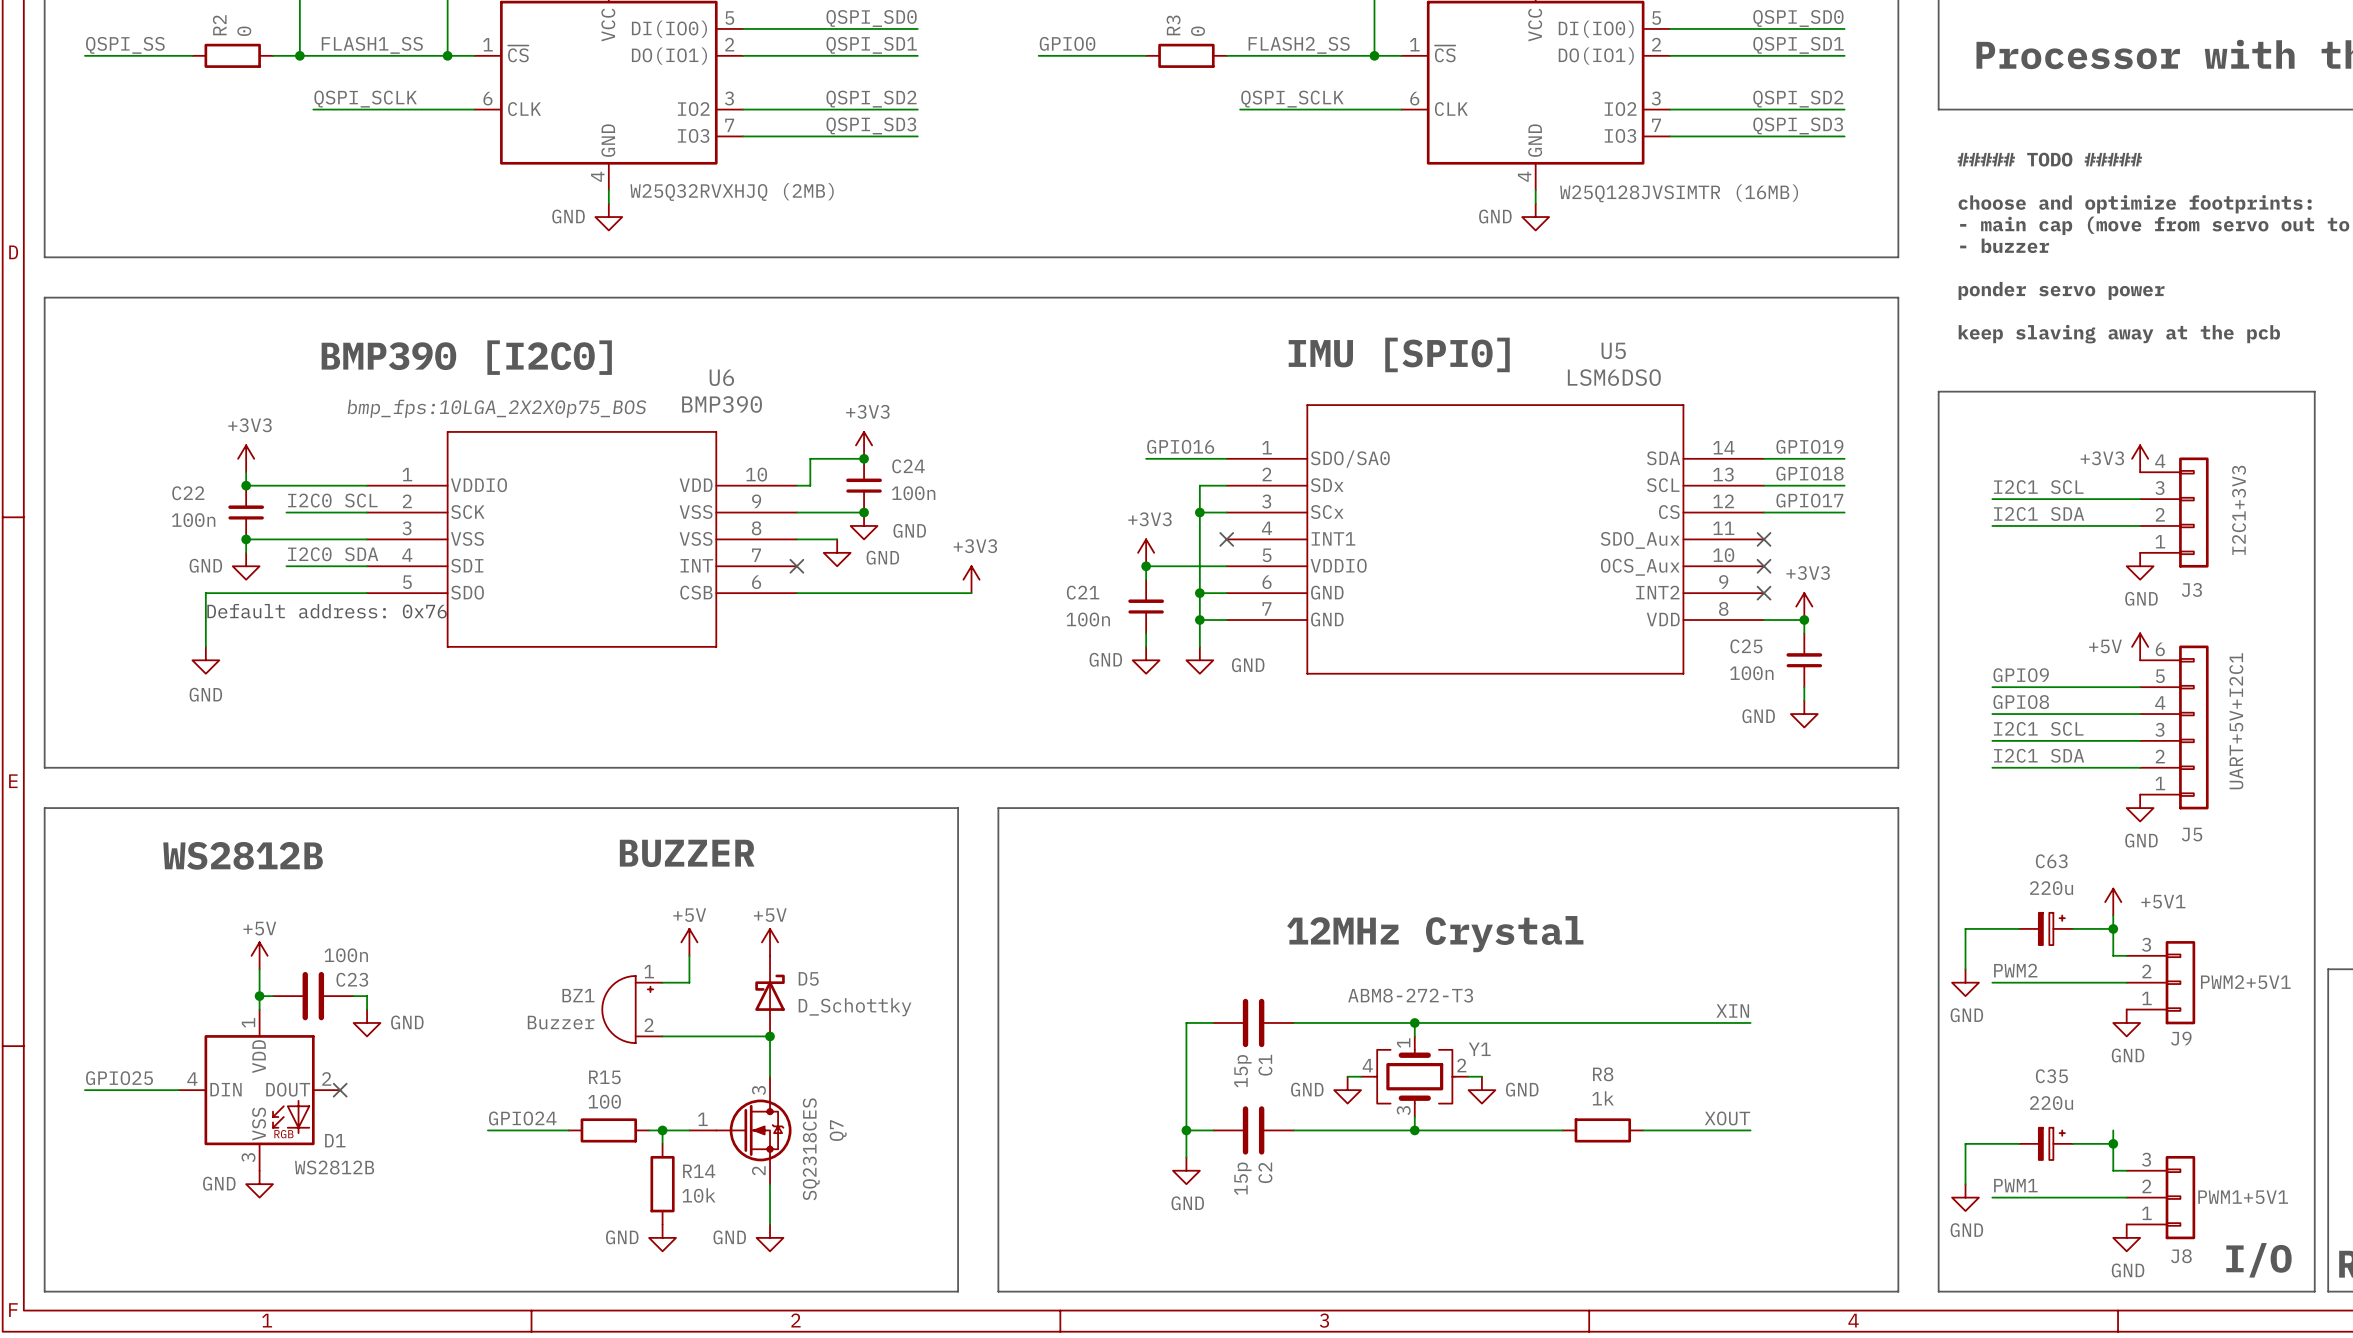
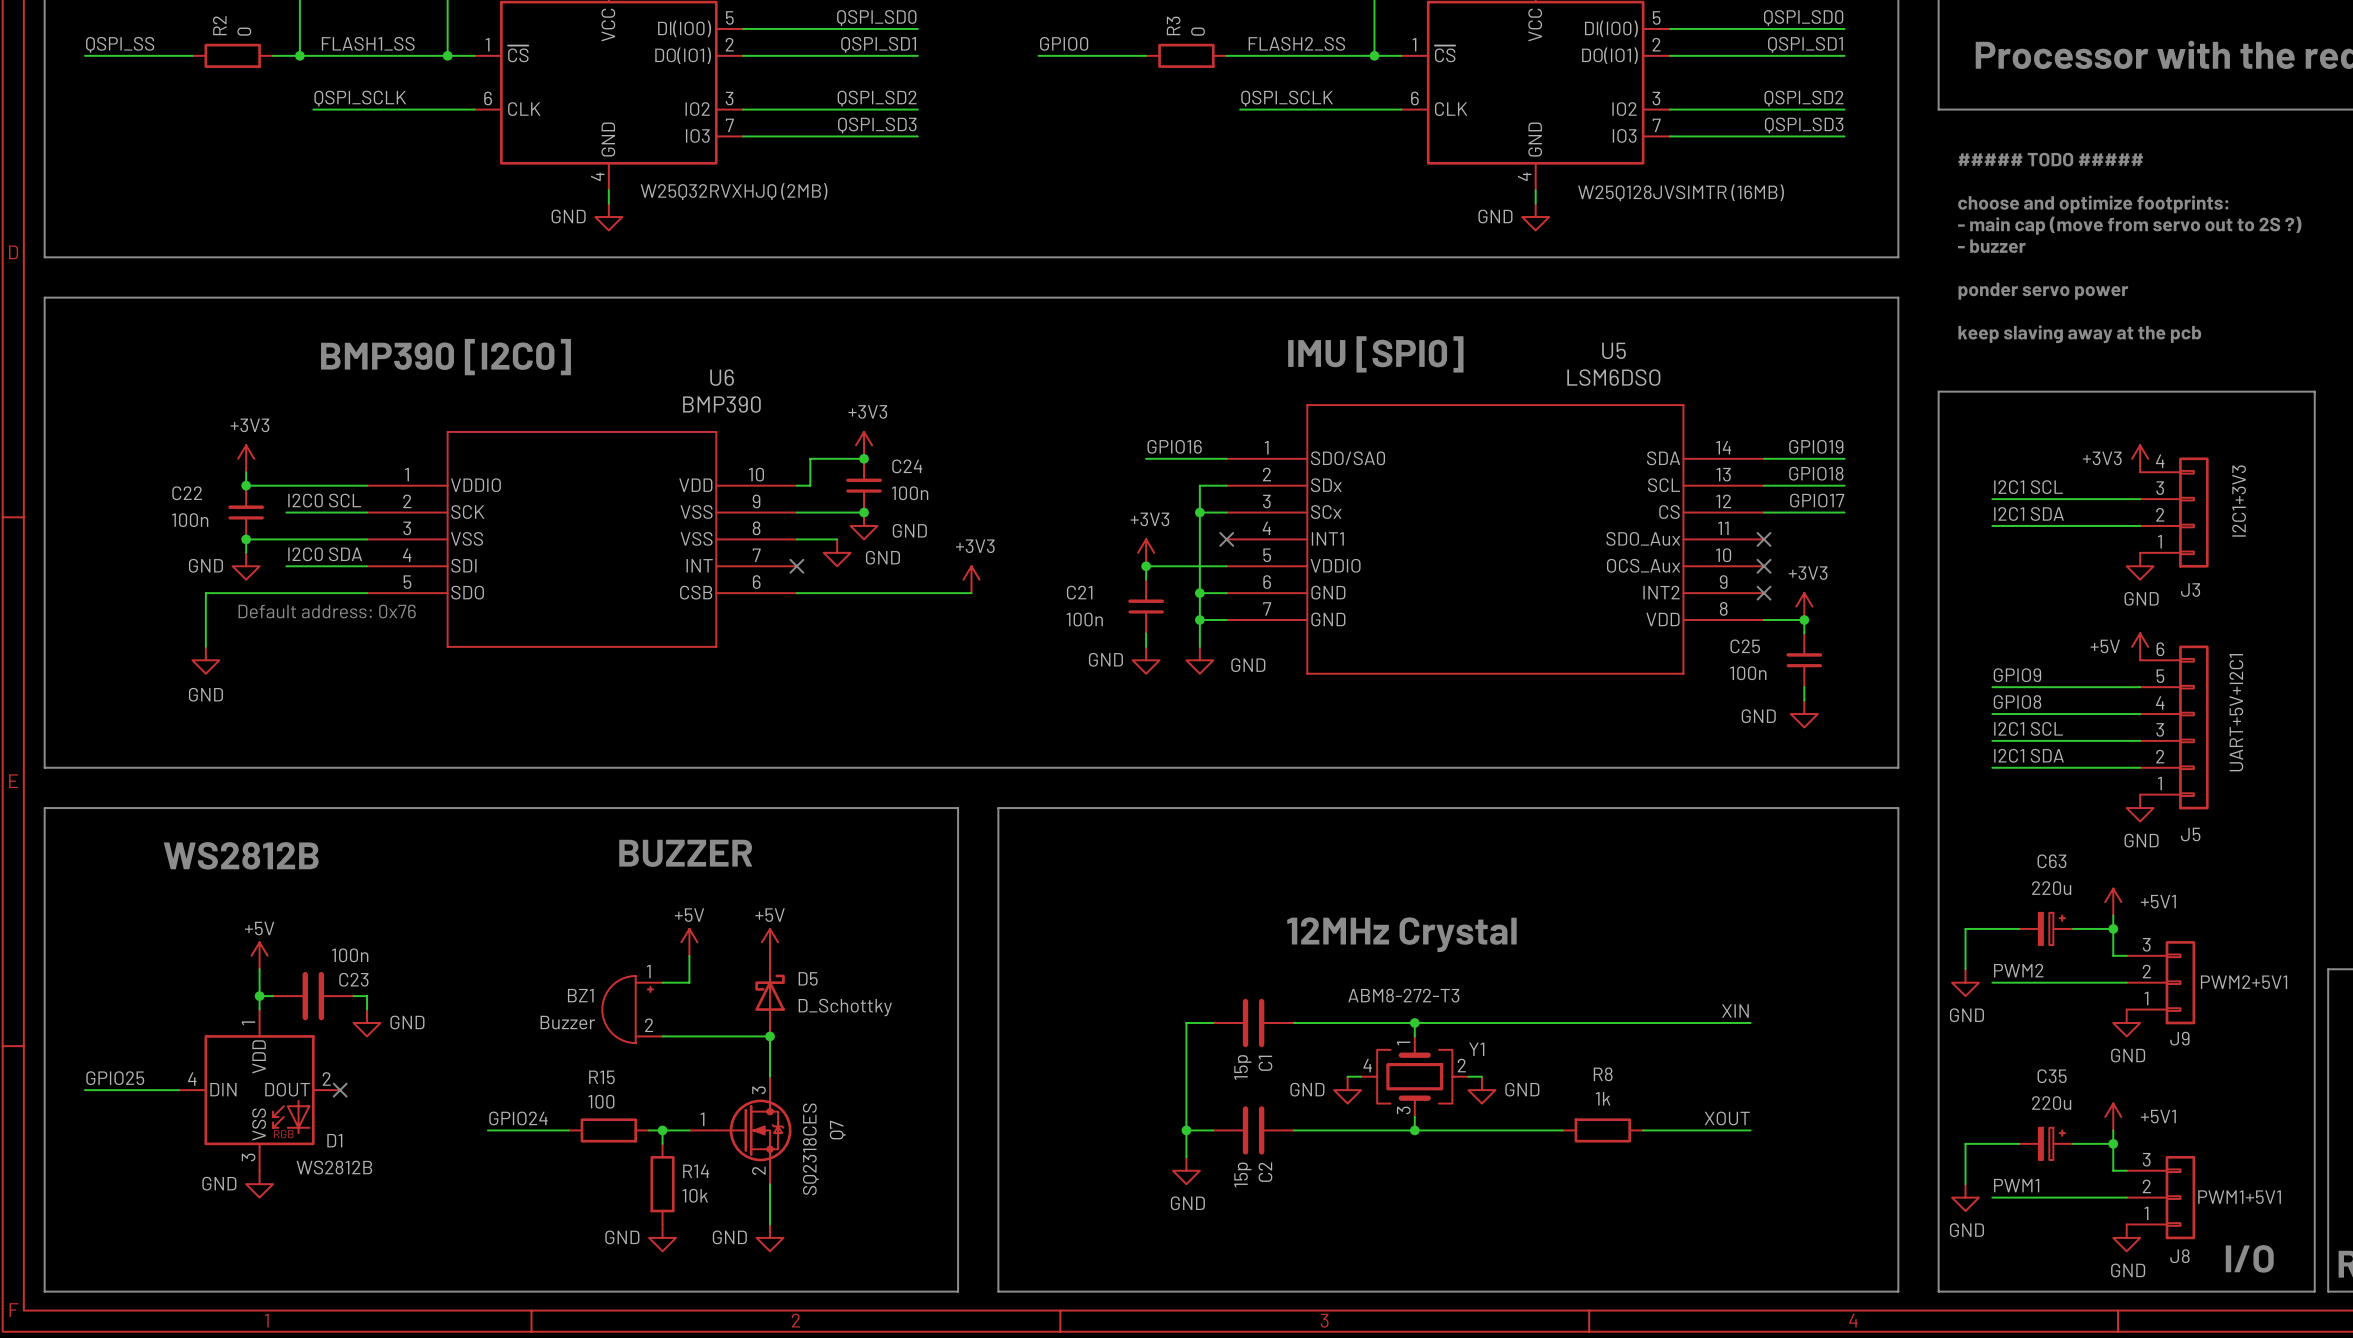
U6 text: bmp_fps:10LGA_2X2X0p75_BOS (497, 408) -> none
power symbol: none -> +5V1 (2113, 1117)

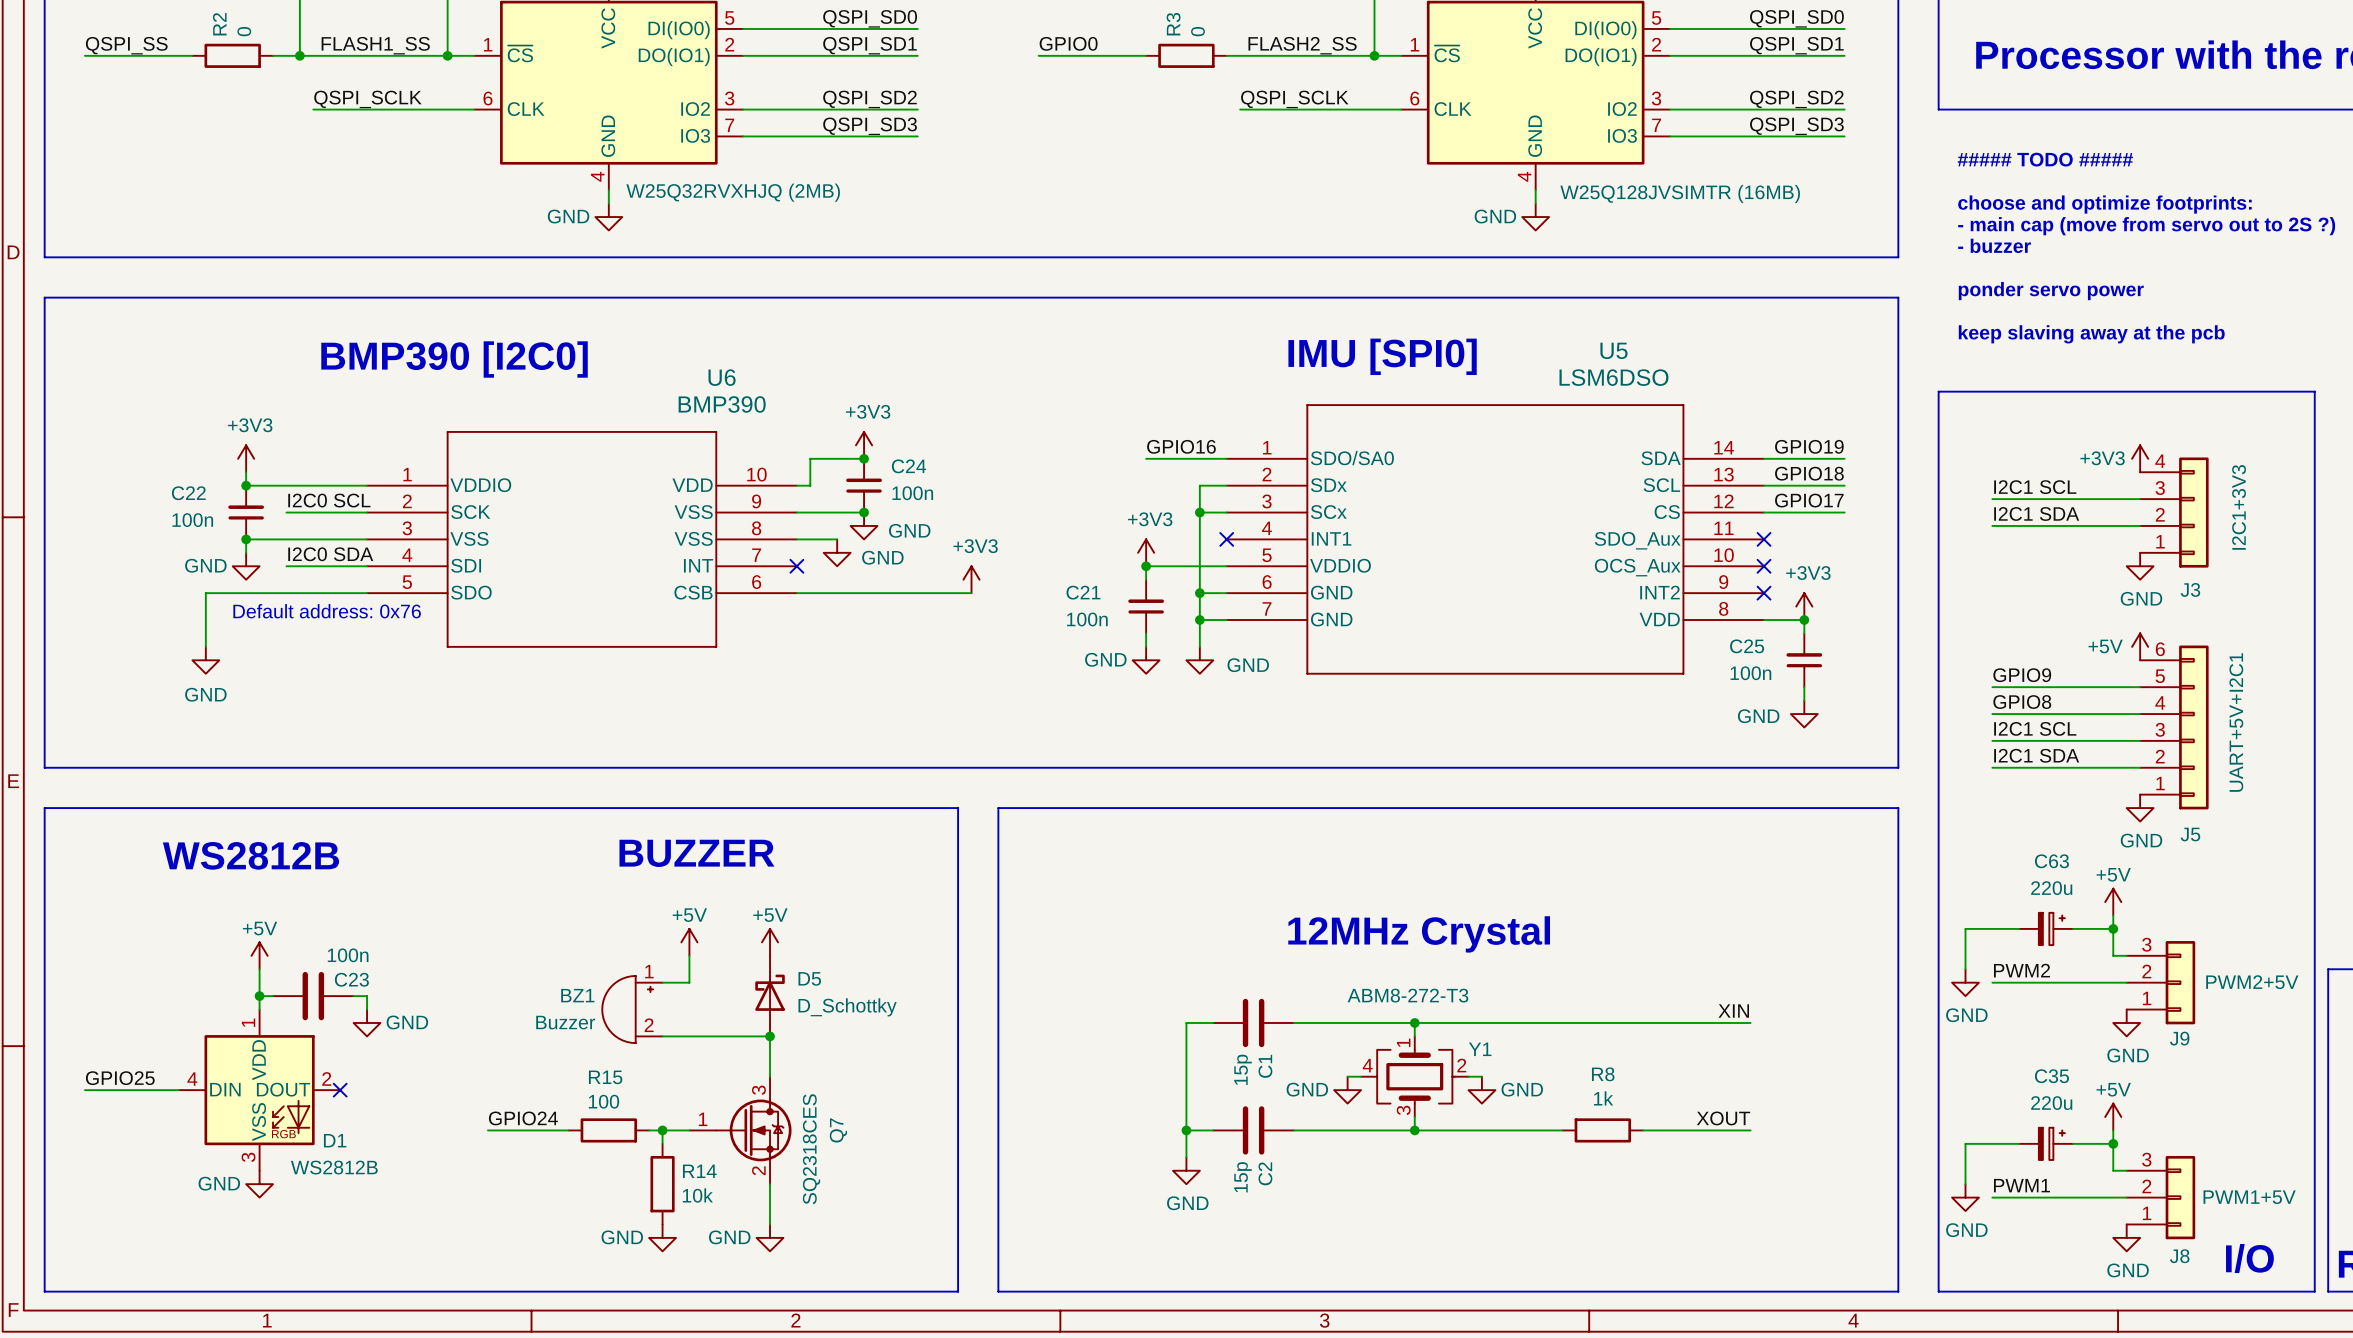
power symbol: +5V1 (2113, 902) -> +5V (2113, 902)
J9 value: PWM2+5V1 (2244, 982) -> PWM2+5V (2252, 982)
power symbol: +5V1 (2113, 1117) -> +5V (2113, 1117)
J8 value: PWM1+5V1 (2239, 1197) -> PWM1+5V (2249, 1197)

